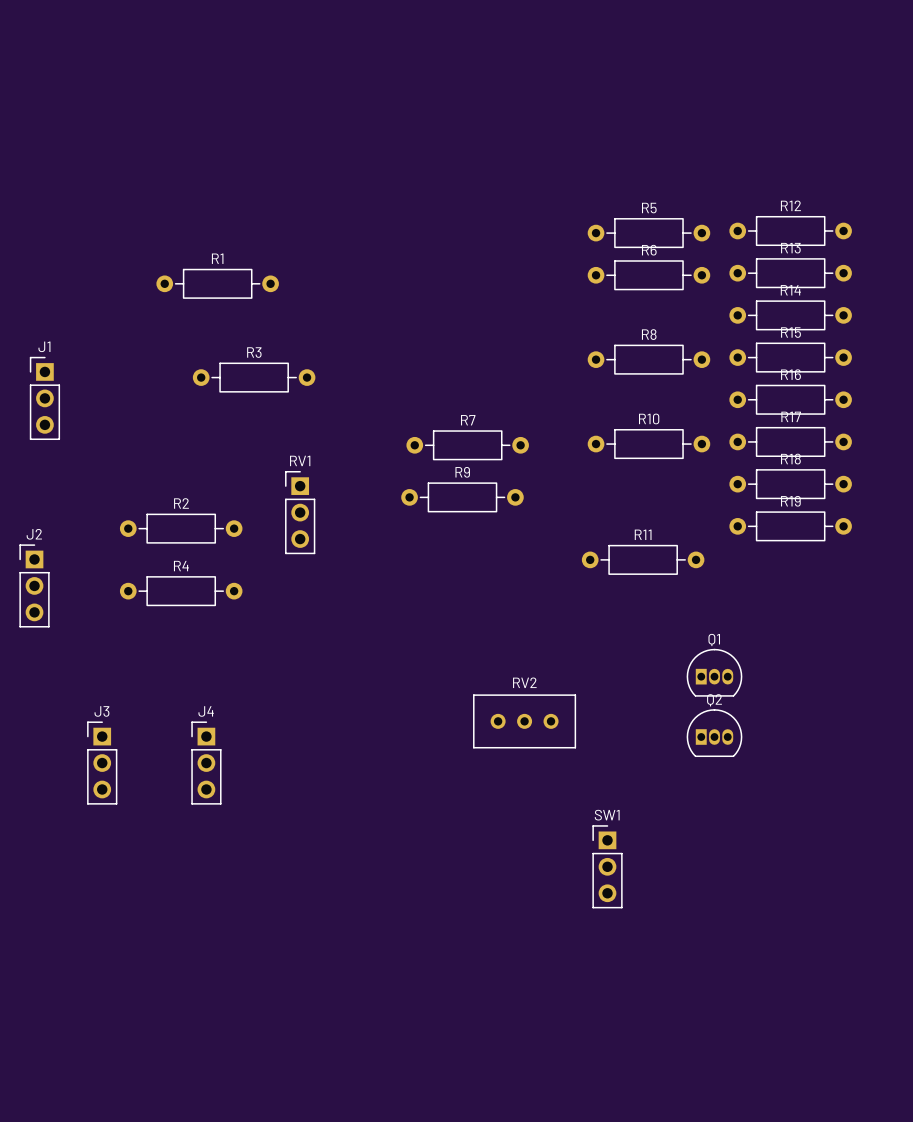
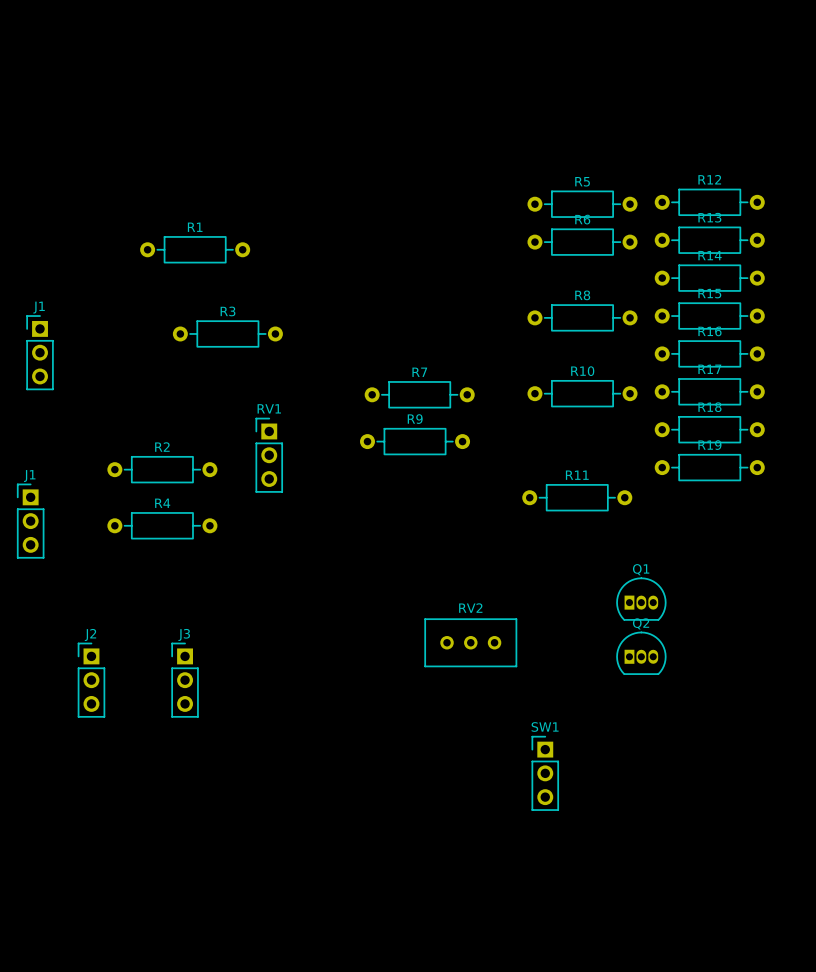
J2 name: J2 (34, 534) -> J1 (29, 476)
J3 name: J3 (101, 711) -> J2 (90, 634)
J4 name: J4 (206, 711) -> J3 (184, 634)

